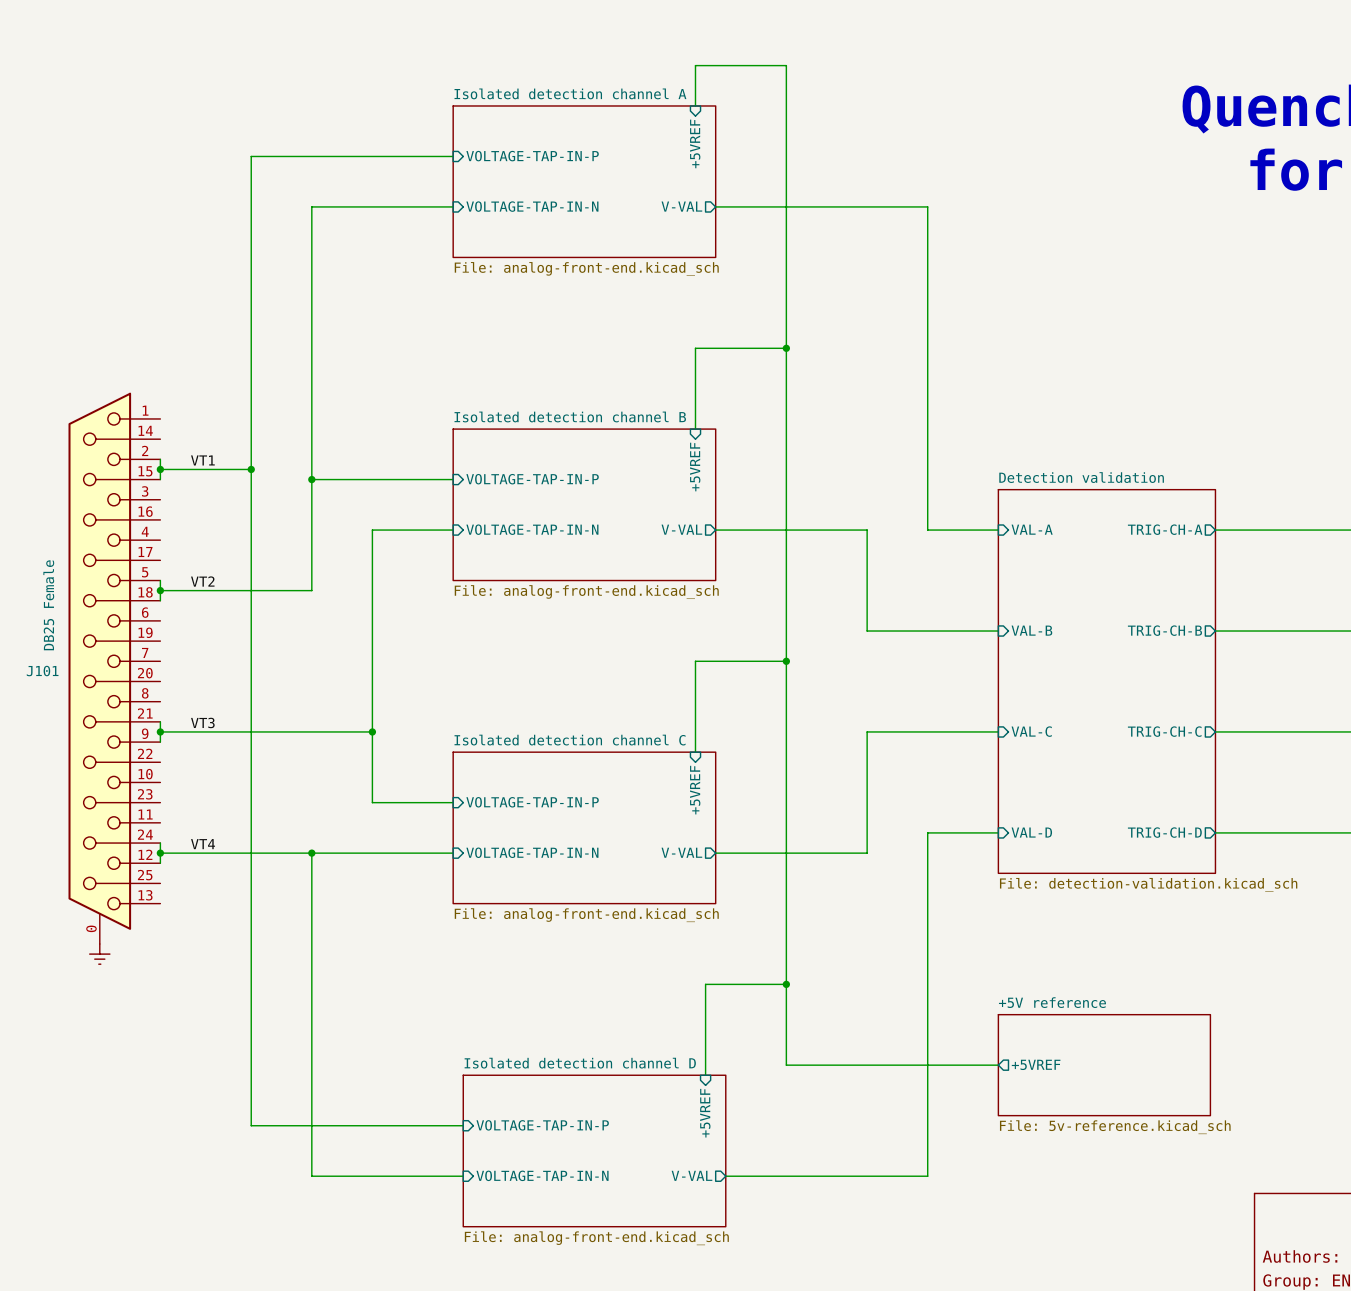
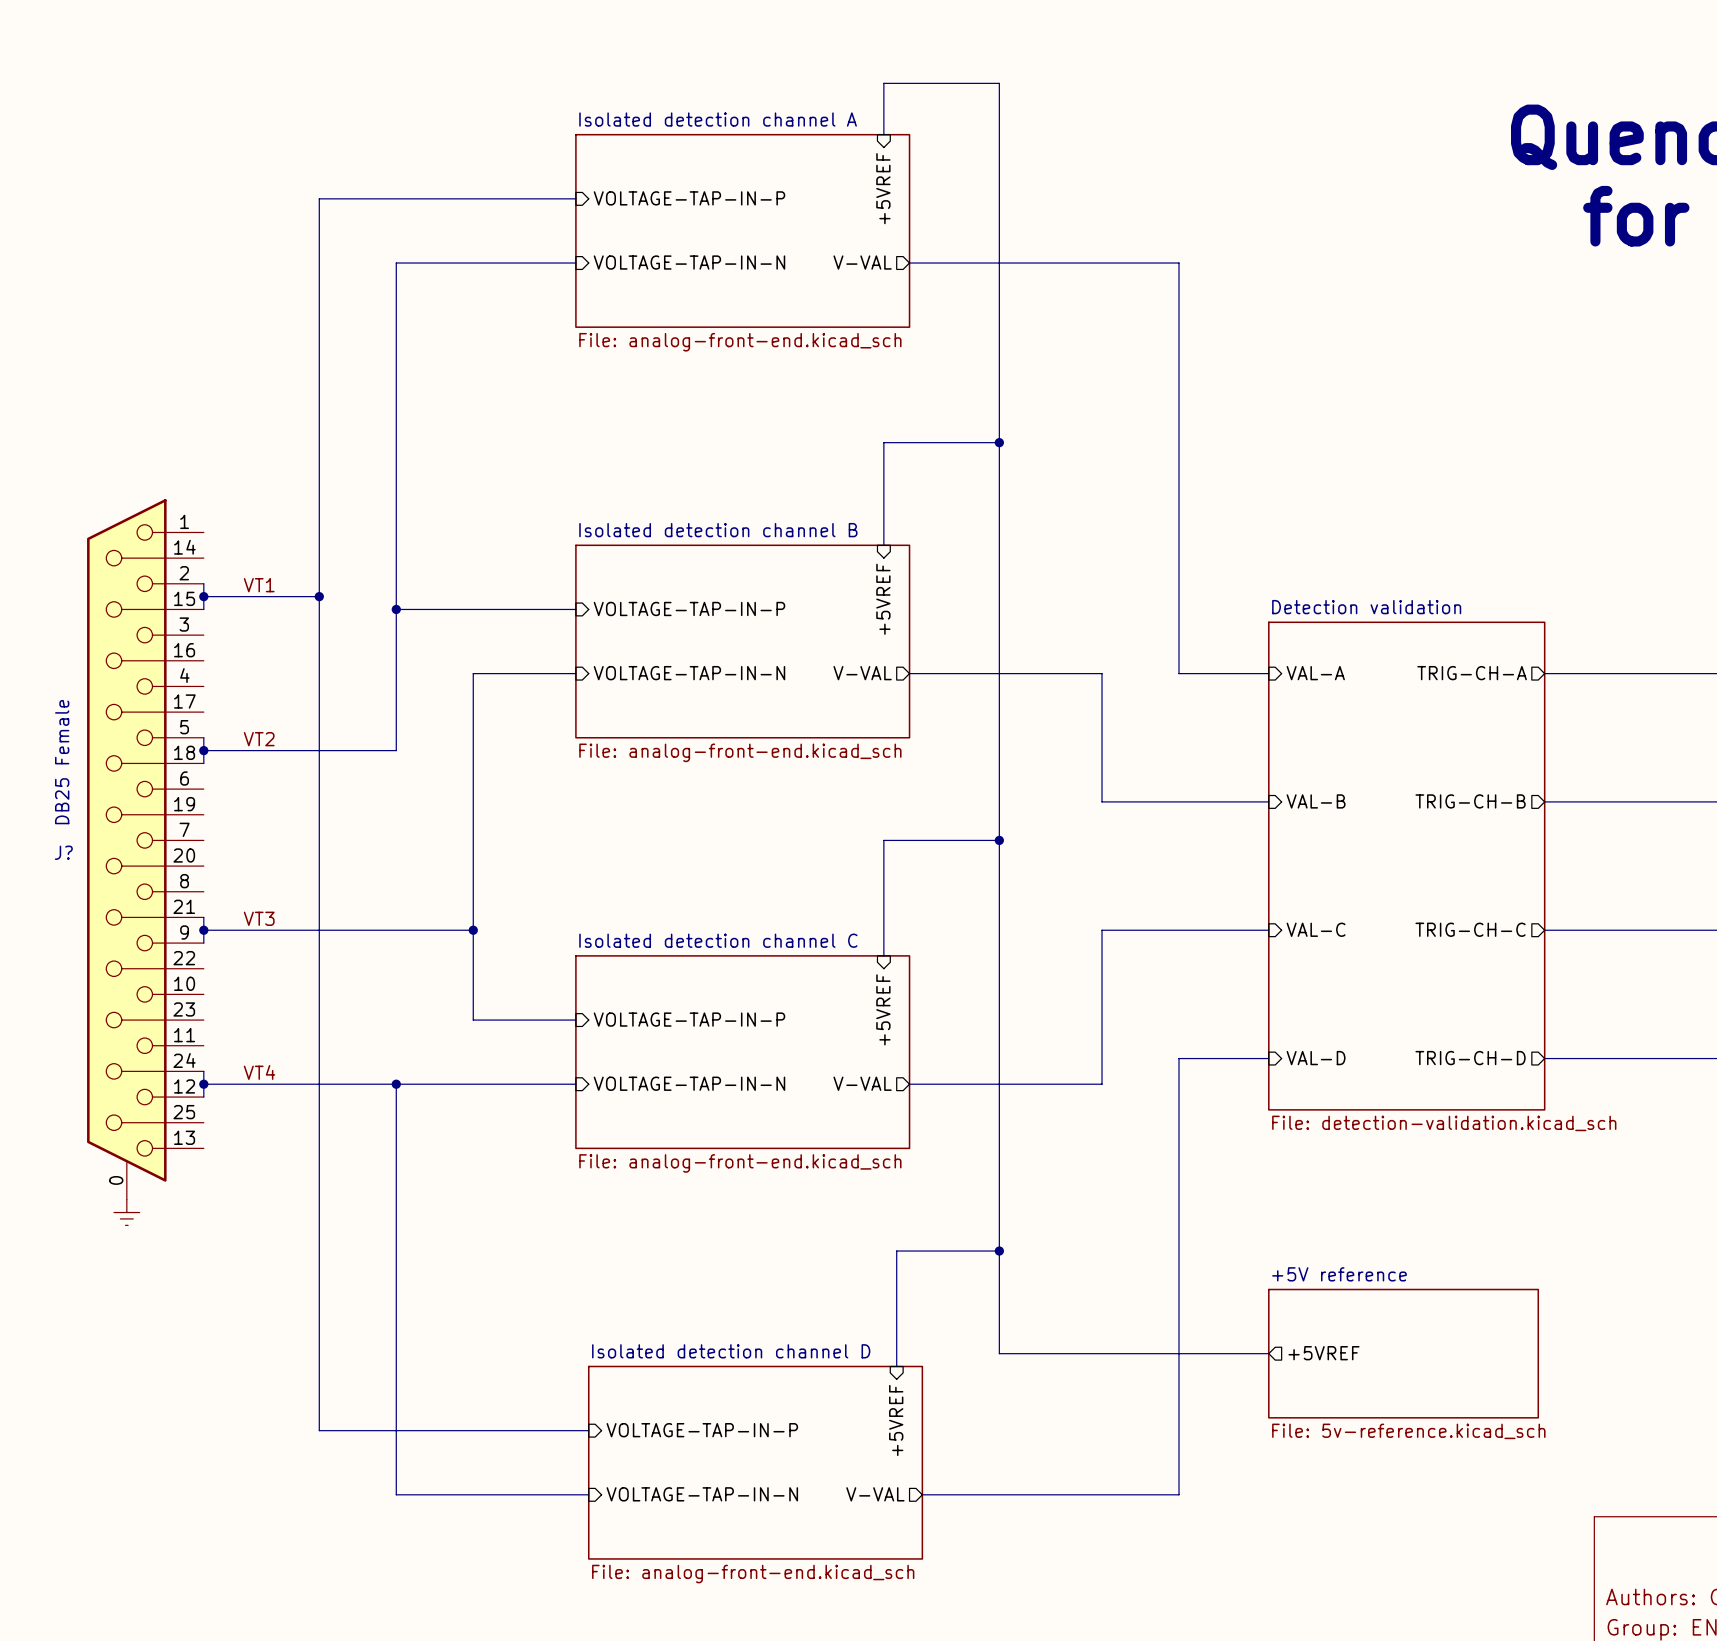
J101 name: J101 (42, 671) -> J? (63, 852)

